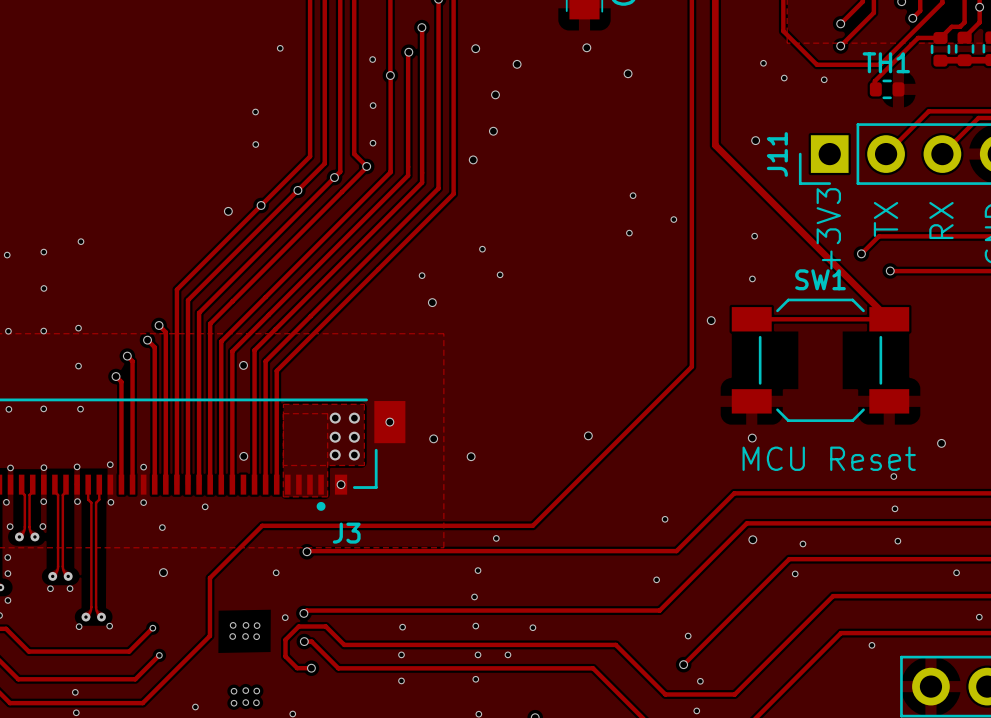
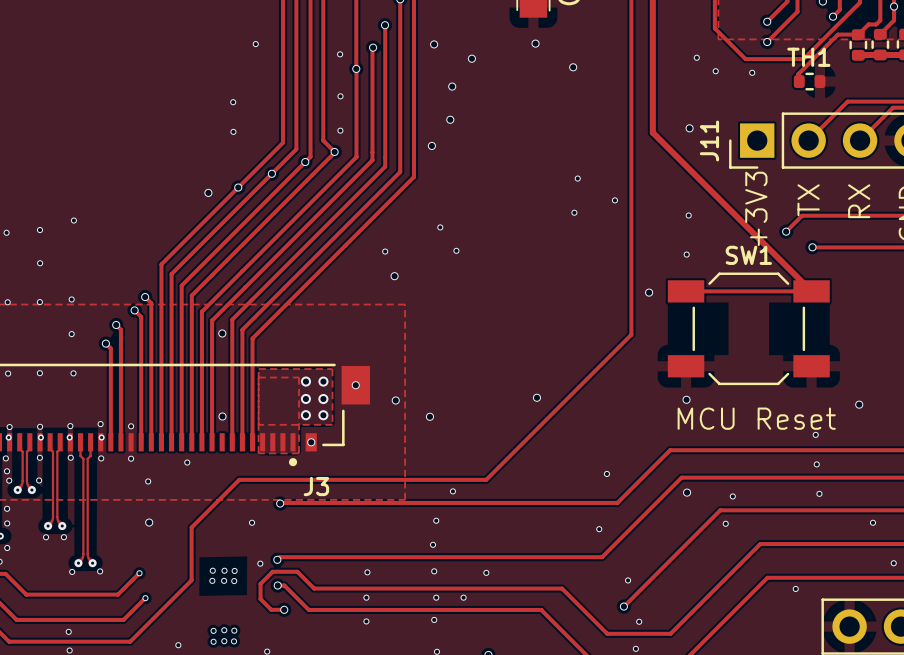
via: none -> (8, 437)
via: none -> (40, 437)
via: none -> (69, 437)
via: none -> (101, 437)
via: none -> (7, 471)

